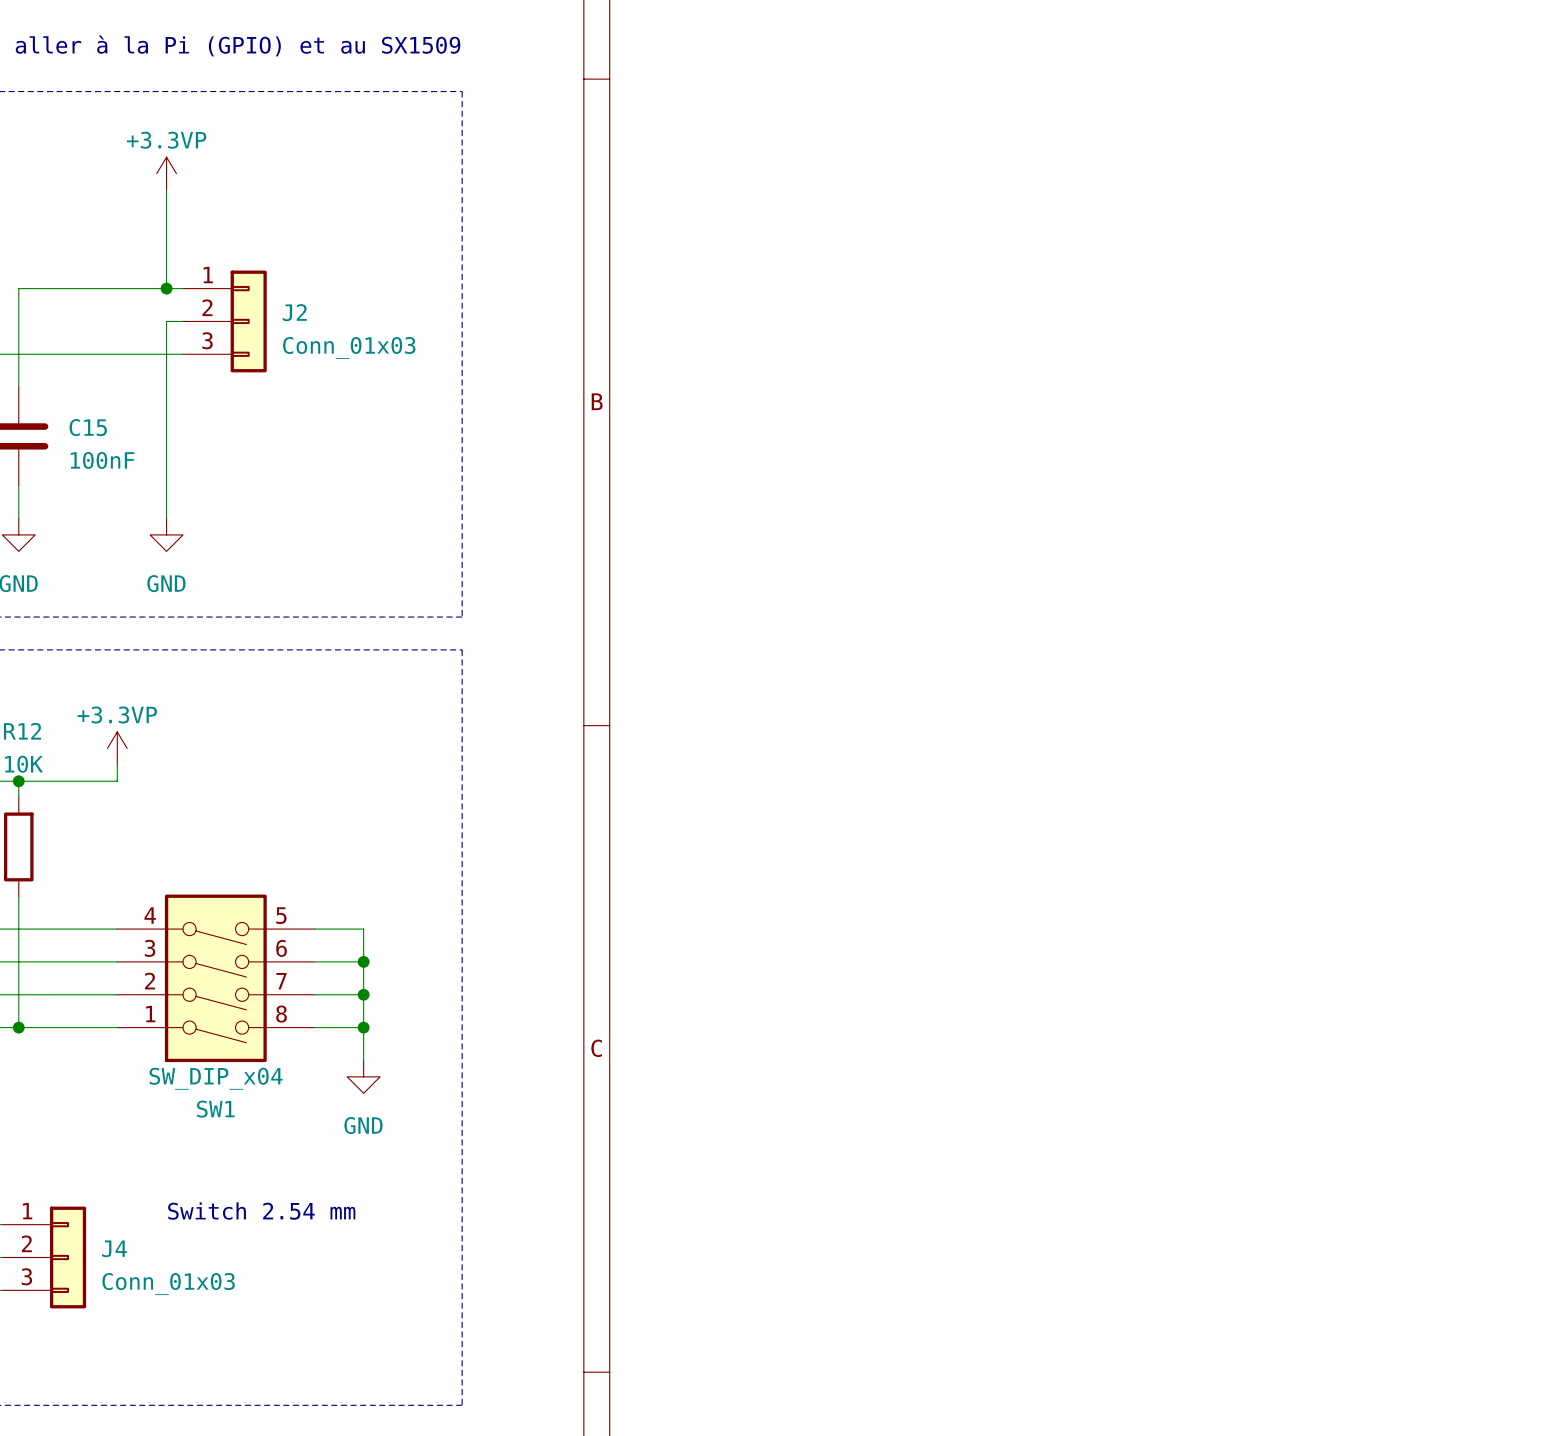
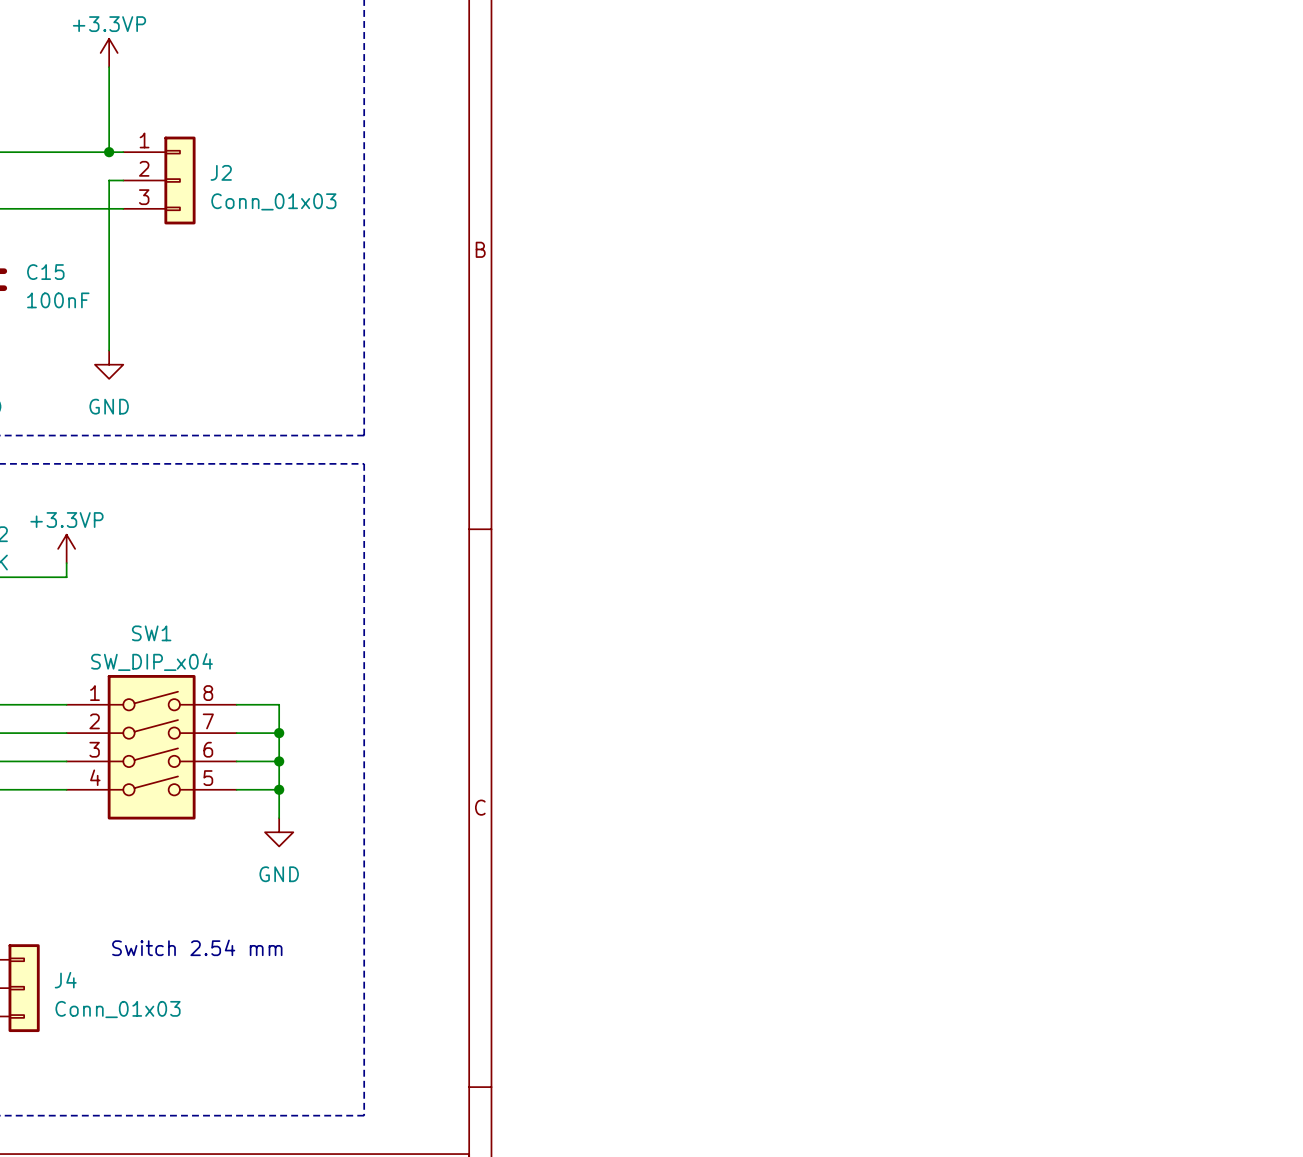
SW1 flip: as is (215, 978) -> up-down (151, 747)

